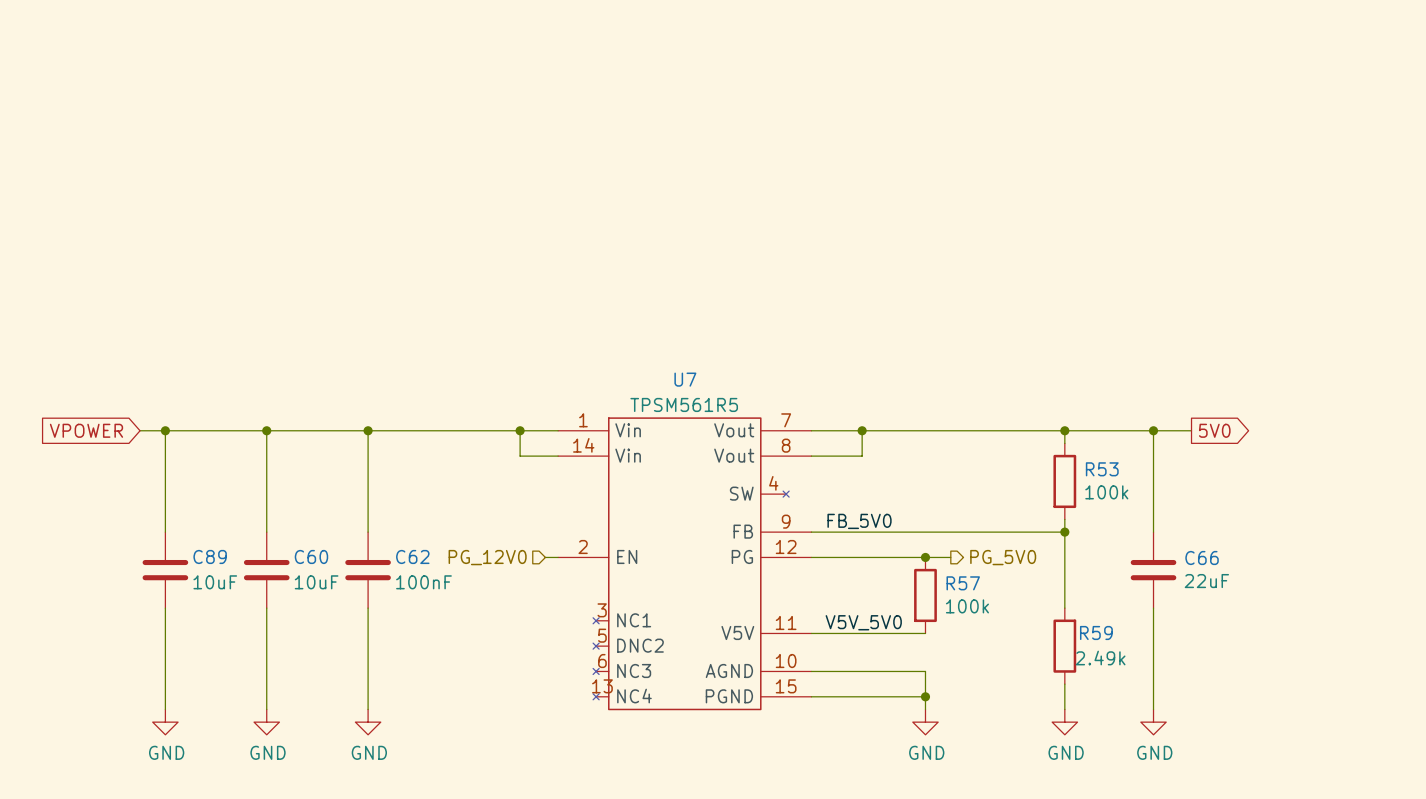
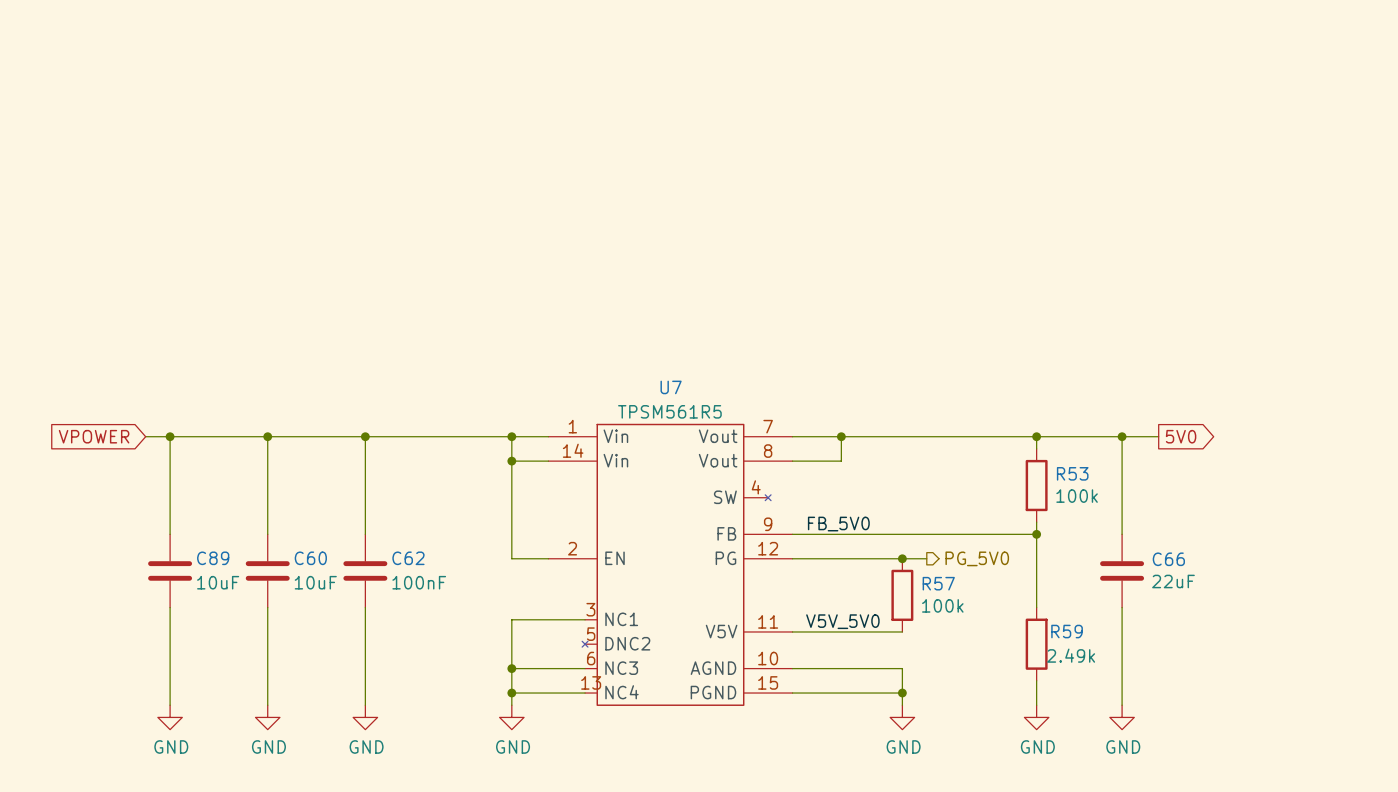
U7 symbol: [558, 417, 851, 711] -> [548, 423, 830, 706]
wire: none -> (511, 461) (511, 558) (536, 558)
junction: none -> (511, 461)
hierarchical label: PG_12V0 (487, 557) -> none
wire: none -> (585, 619) (511, 619) (511, 705)
wire: none -> (511, 668) (585, 668)
junction: none -> (511, 668)
wire: none -> (511, 693) (585, 693)
junction: none -> (511, 693)
power symbol: none -> GND (511, 717)

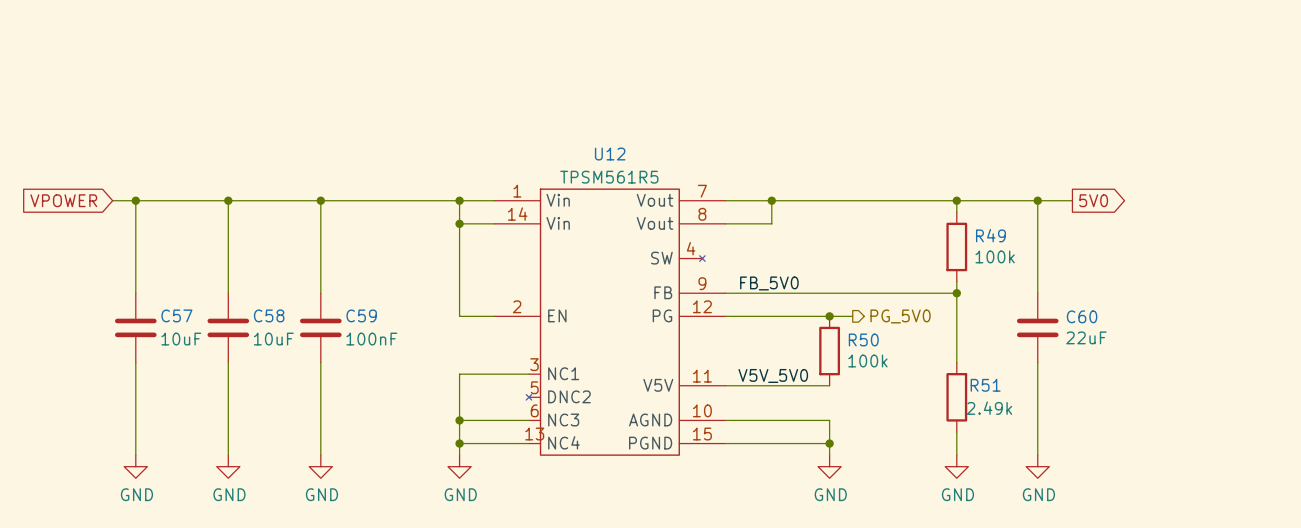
U7 name: U7 (671, 387) -> U12 (610, 154)
R53 name: R53 (1072, 473) -> R49 (990, 235)
C89 name: C89 (213, 558) -> C57 (176, 315)
C60 name: C60 (310, 558) -> C58 (269, 315)
C62 name: C62 (408, 558) -> C59 (361, 315)
C66 name: C66 (1168, 559) -> C60 (1082, 316)
R57 name: R57 (938, 583) -> R50 (863, 339)
R59 name: R59 (1067, 631) -> R51 (985, 385)

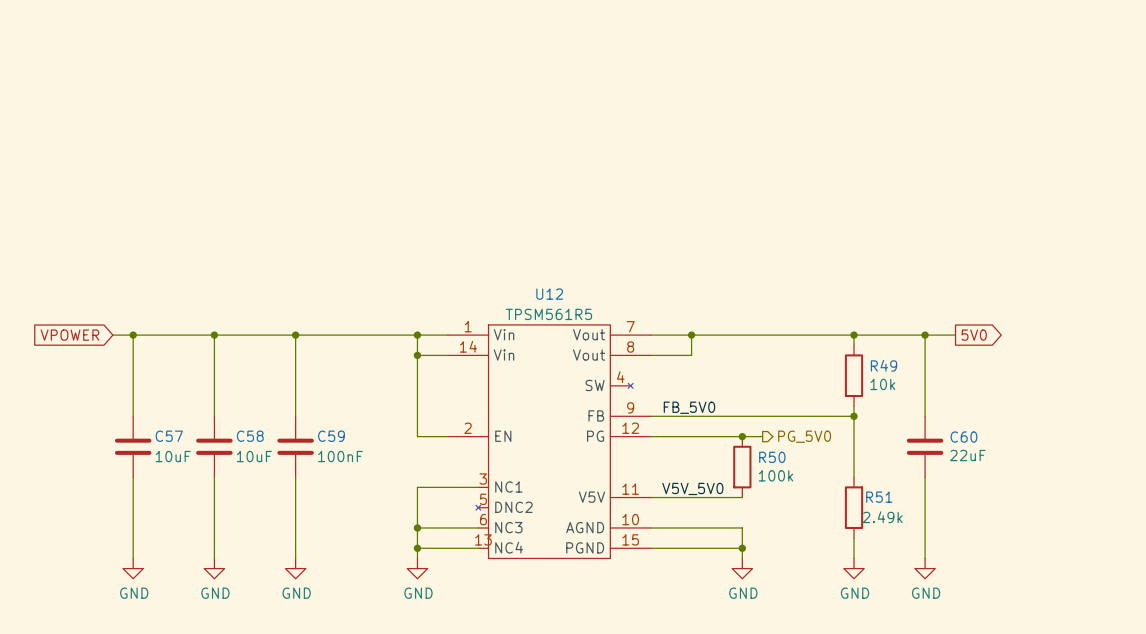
R49 value: 100k (995, 256) -> 10k (882, 384)

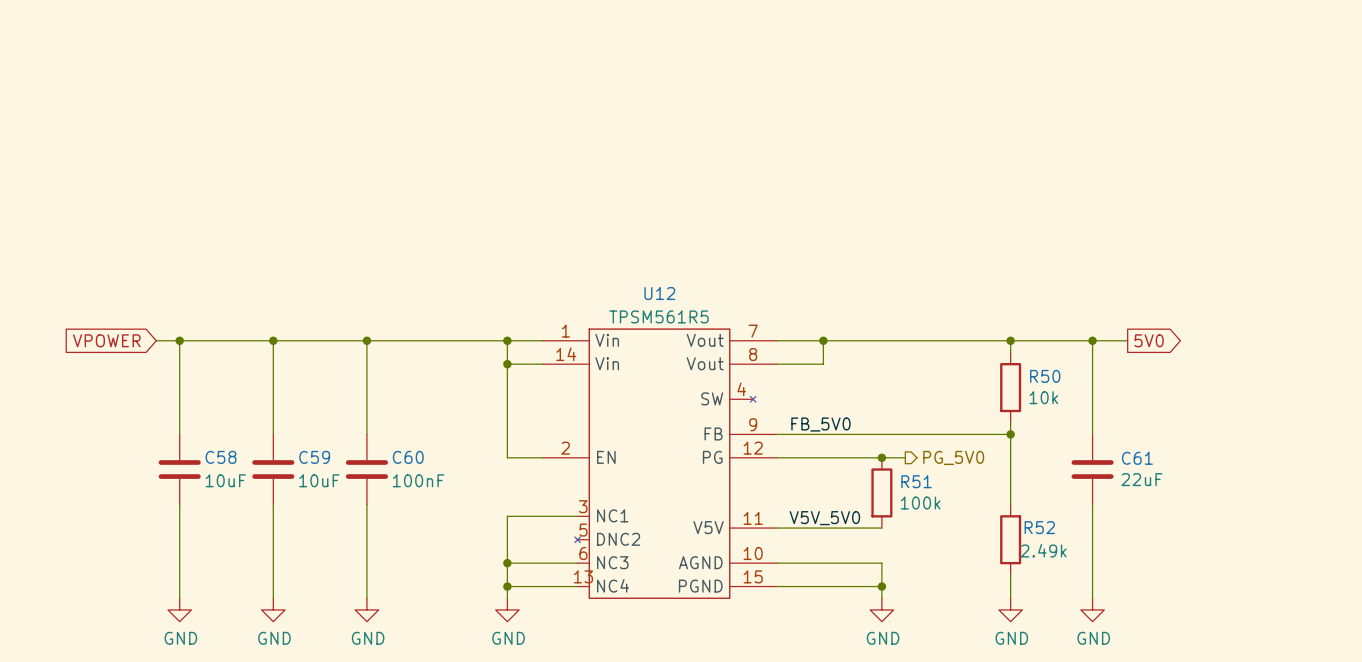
R49 name: R49 (884, 365) -> R50 (1045, 376)
C57 name: C57 (169, 436) -> C58 (221, 457)
C58 name: C58 (250, 436) -> C59 (314, 457)
C59 name: C59 (331, 436) -> C60 (408, 457)
C60 name: C60 (963, 437) -> C61 (1137, 458)
R50 name: R50 (772, 457) -> R51 (916, 481)
R51 name: R51 (879, 497) -> R52 (1039, 527)

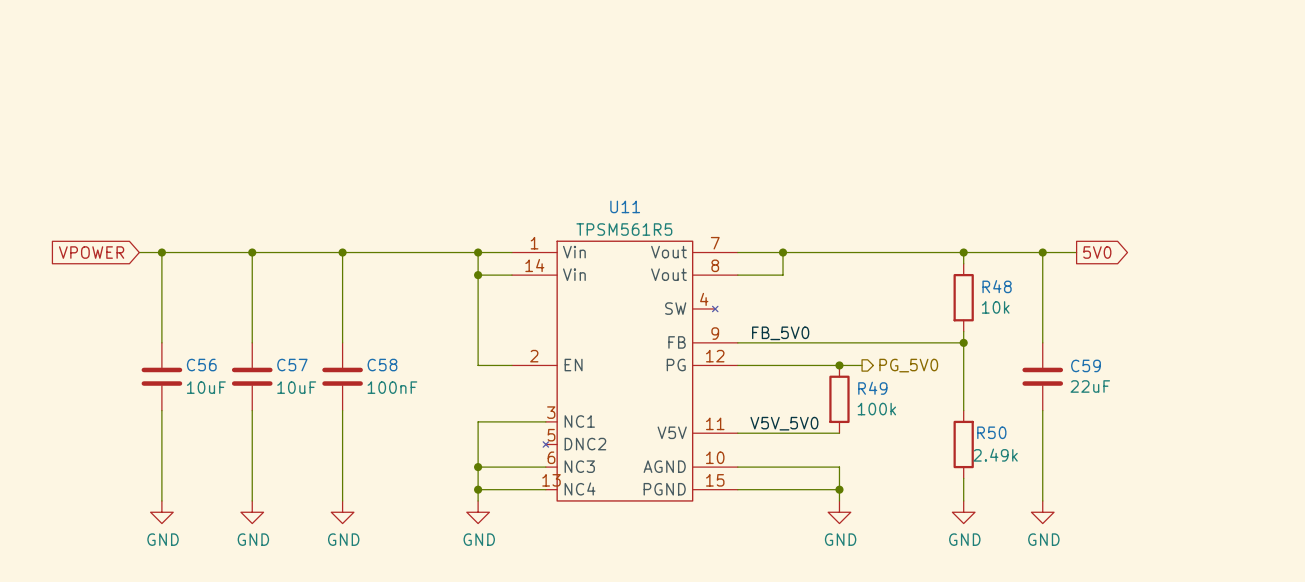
U12 name: U12 (659, 293) -> U11 (625, 206)
R50 name: R50 (1045, 376) -> R48 (997, 286)
C58 name: C58 (221, 457) -> C56 (201, 365)
C59 name: C59 (314, 457) -> C57 (292, 365)
C60 name: C60 (408, 457) -> C58 (382, 365)
C61 name: C61 (1137, 458) -> C59 (1086, 365)
R51 name: R51 (916, 481) -> R49 (872, 388)
R52 name: R52 (1039, 527) -> R50 (991, 432)

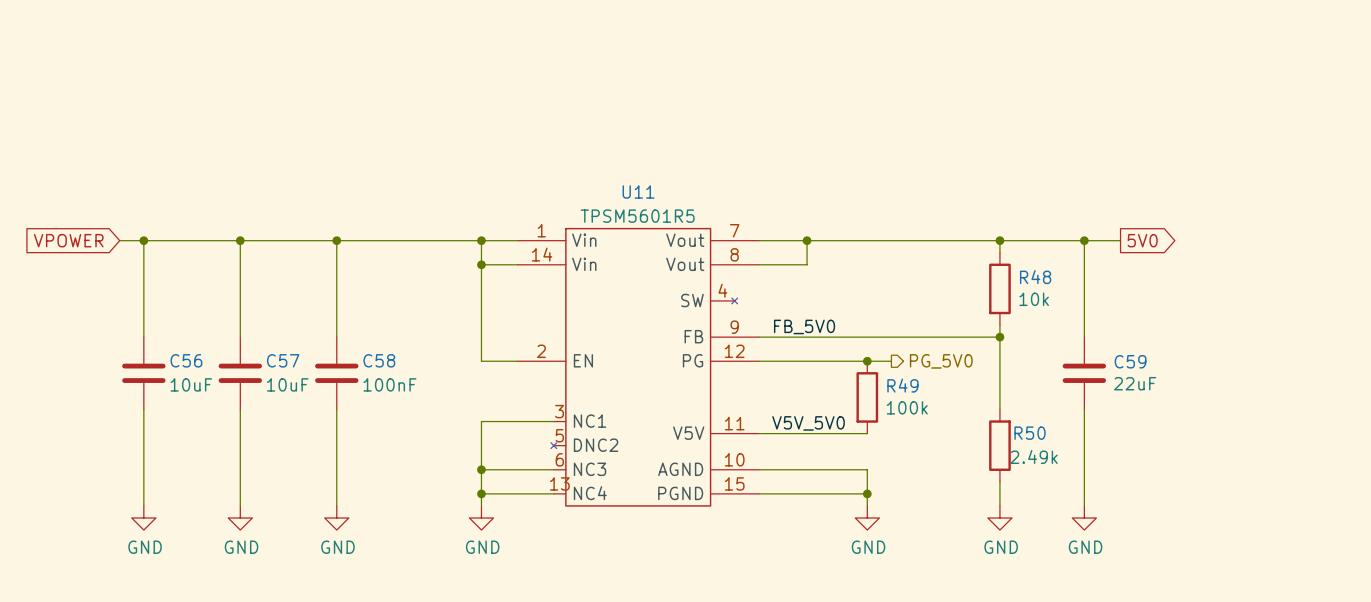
U11 value: TPSM561R5 (624, 229) -> TPSM5601R5 (637, 216)

